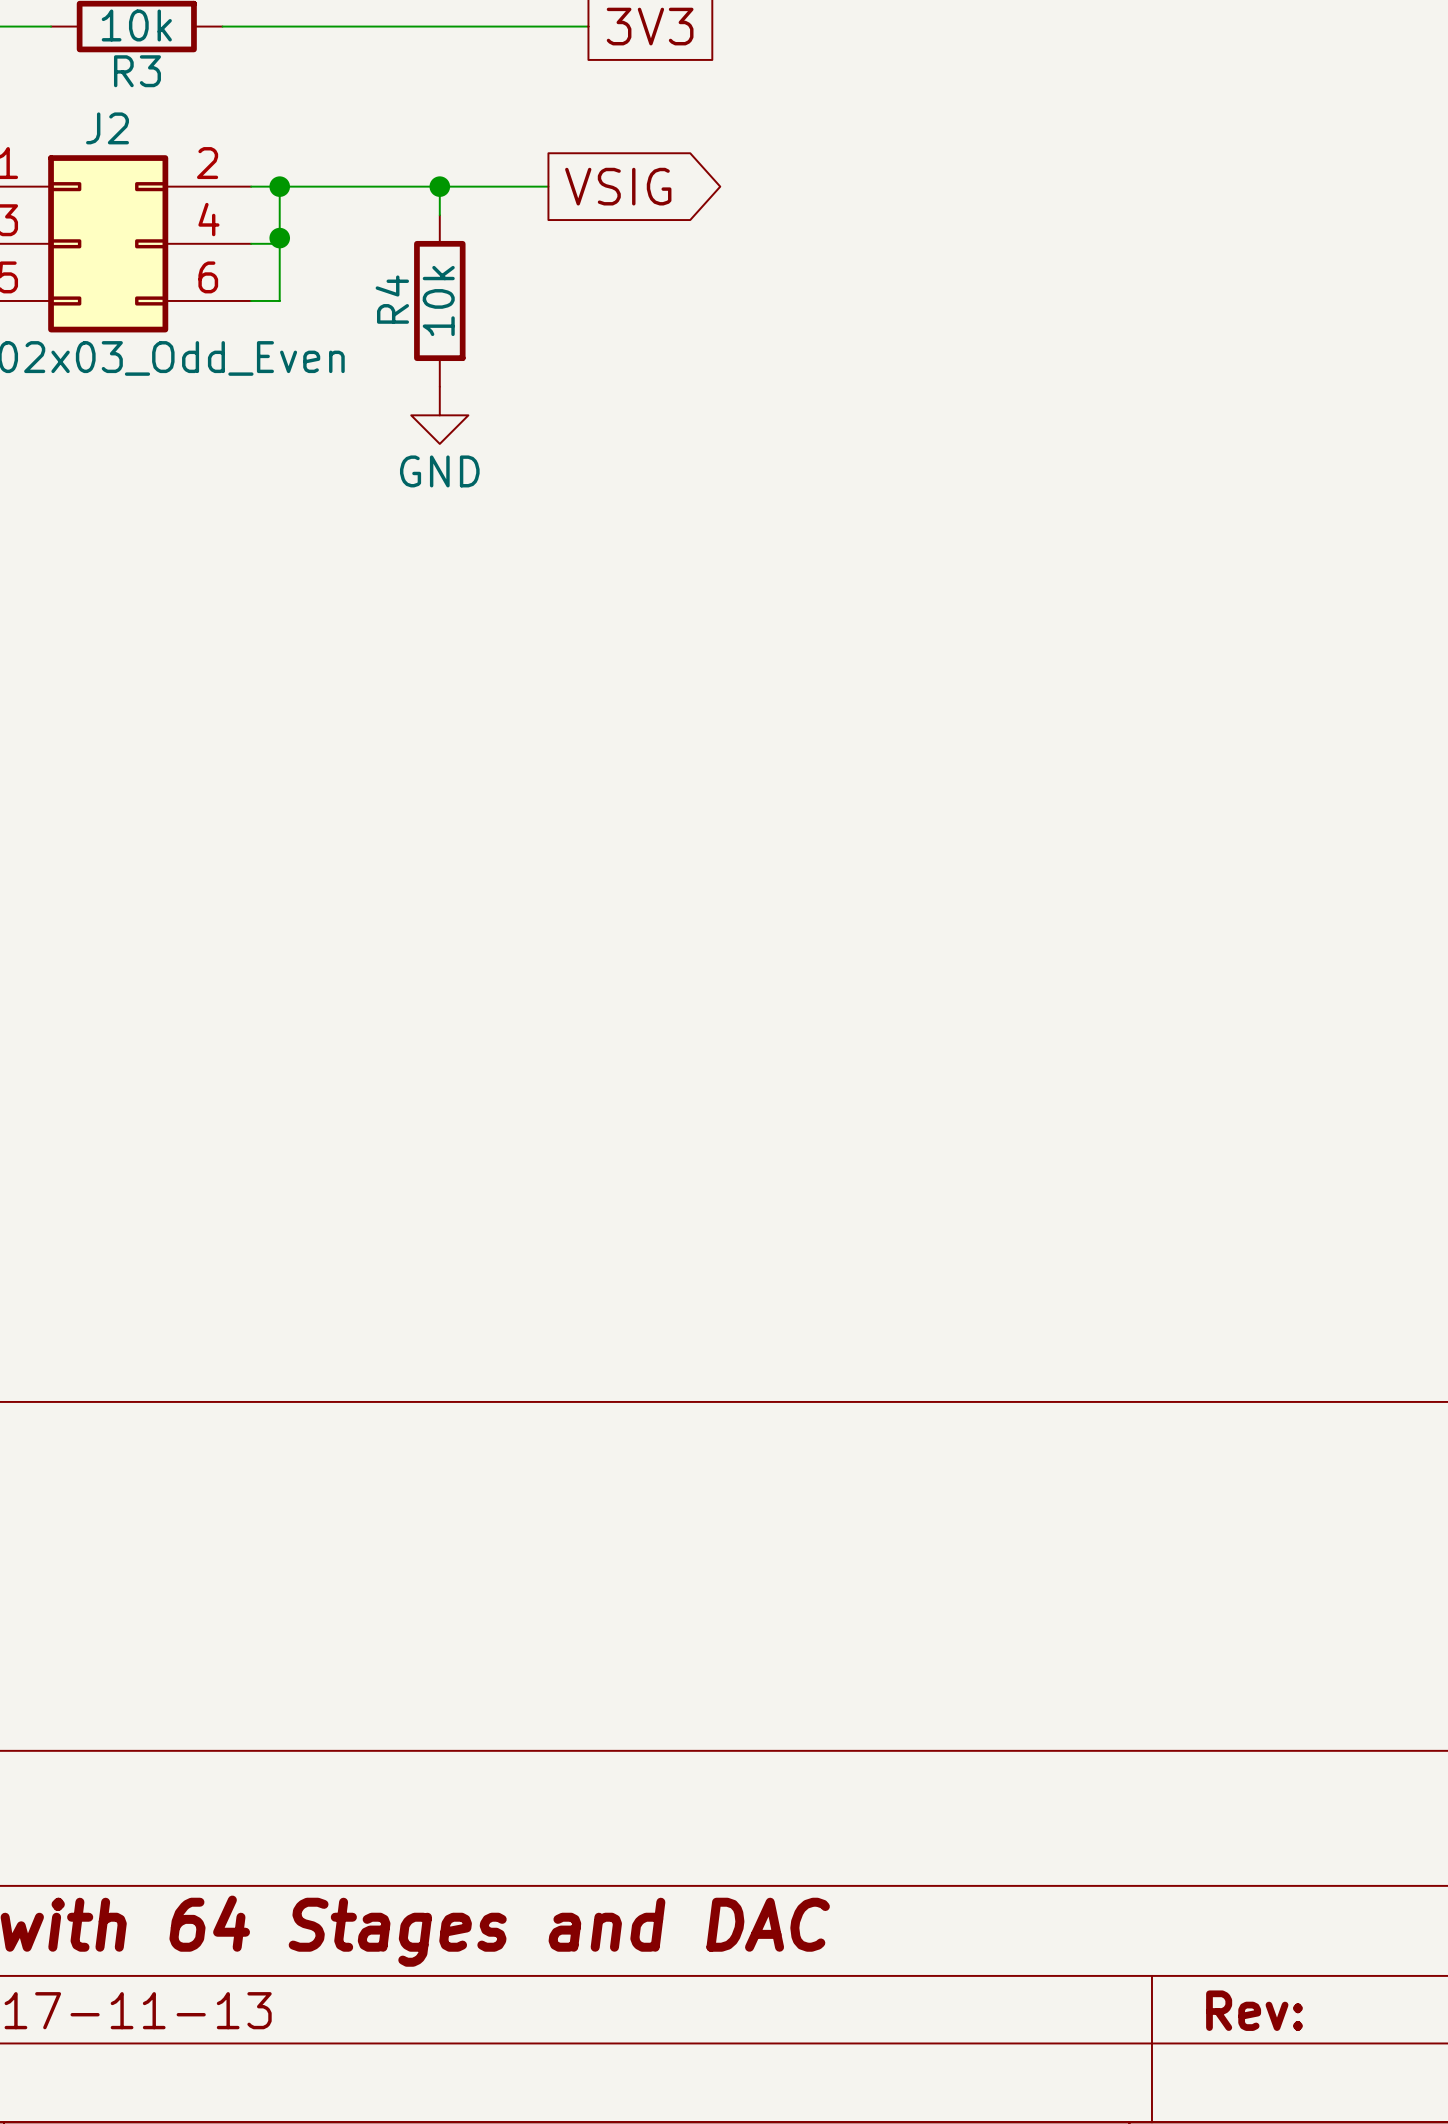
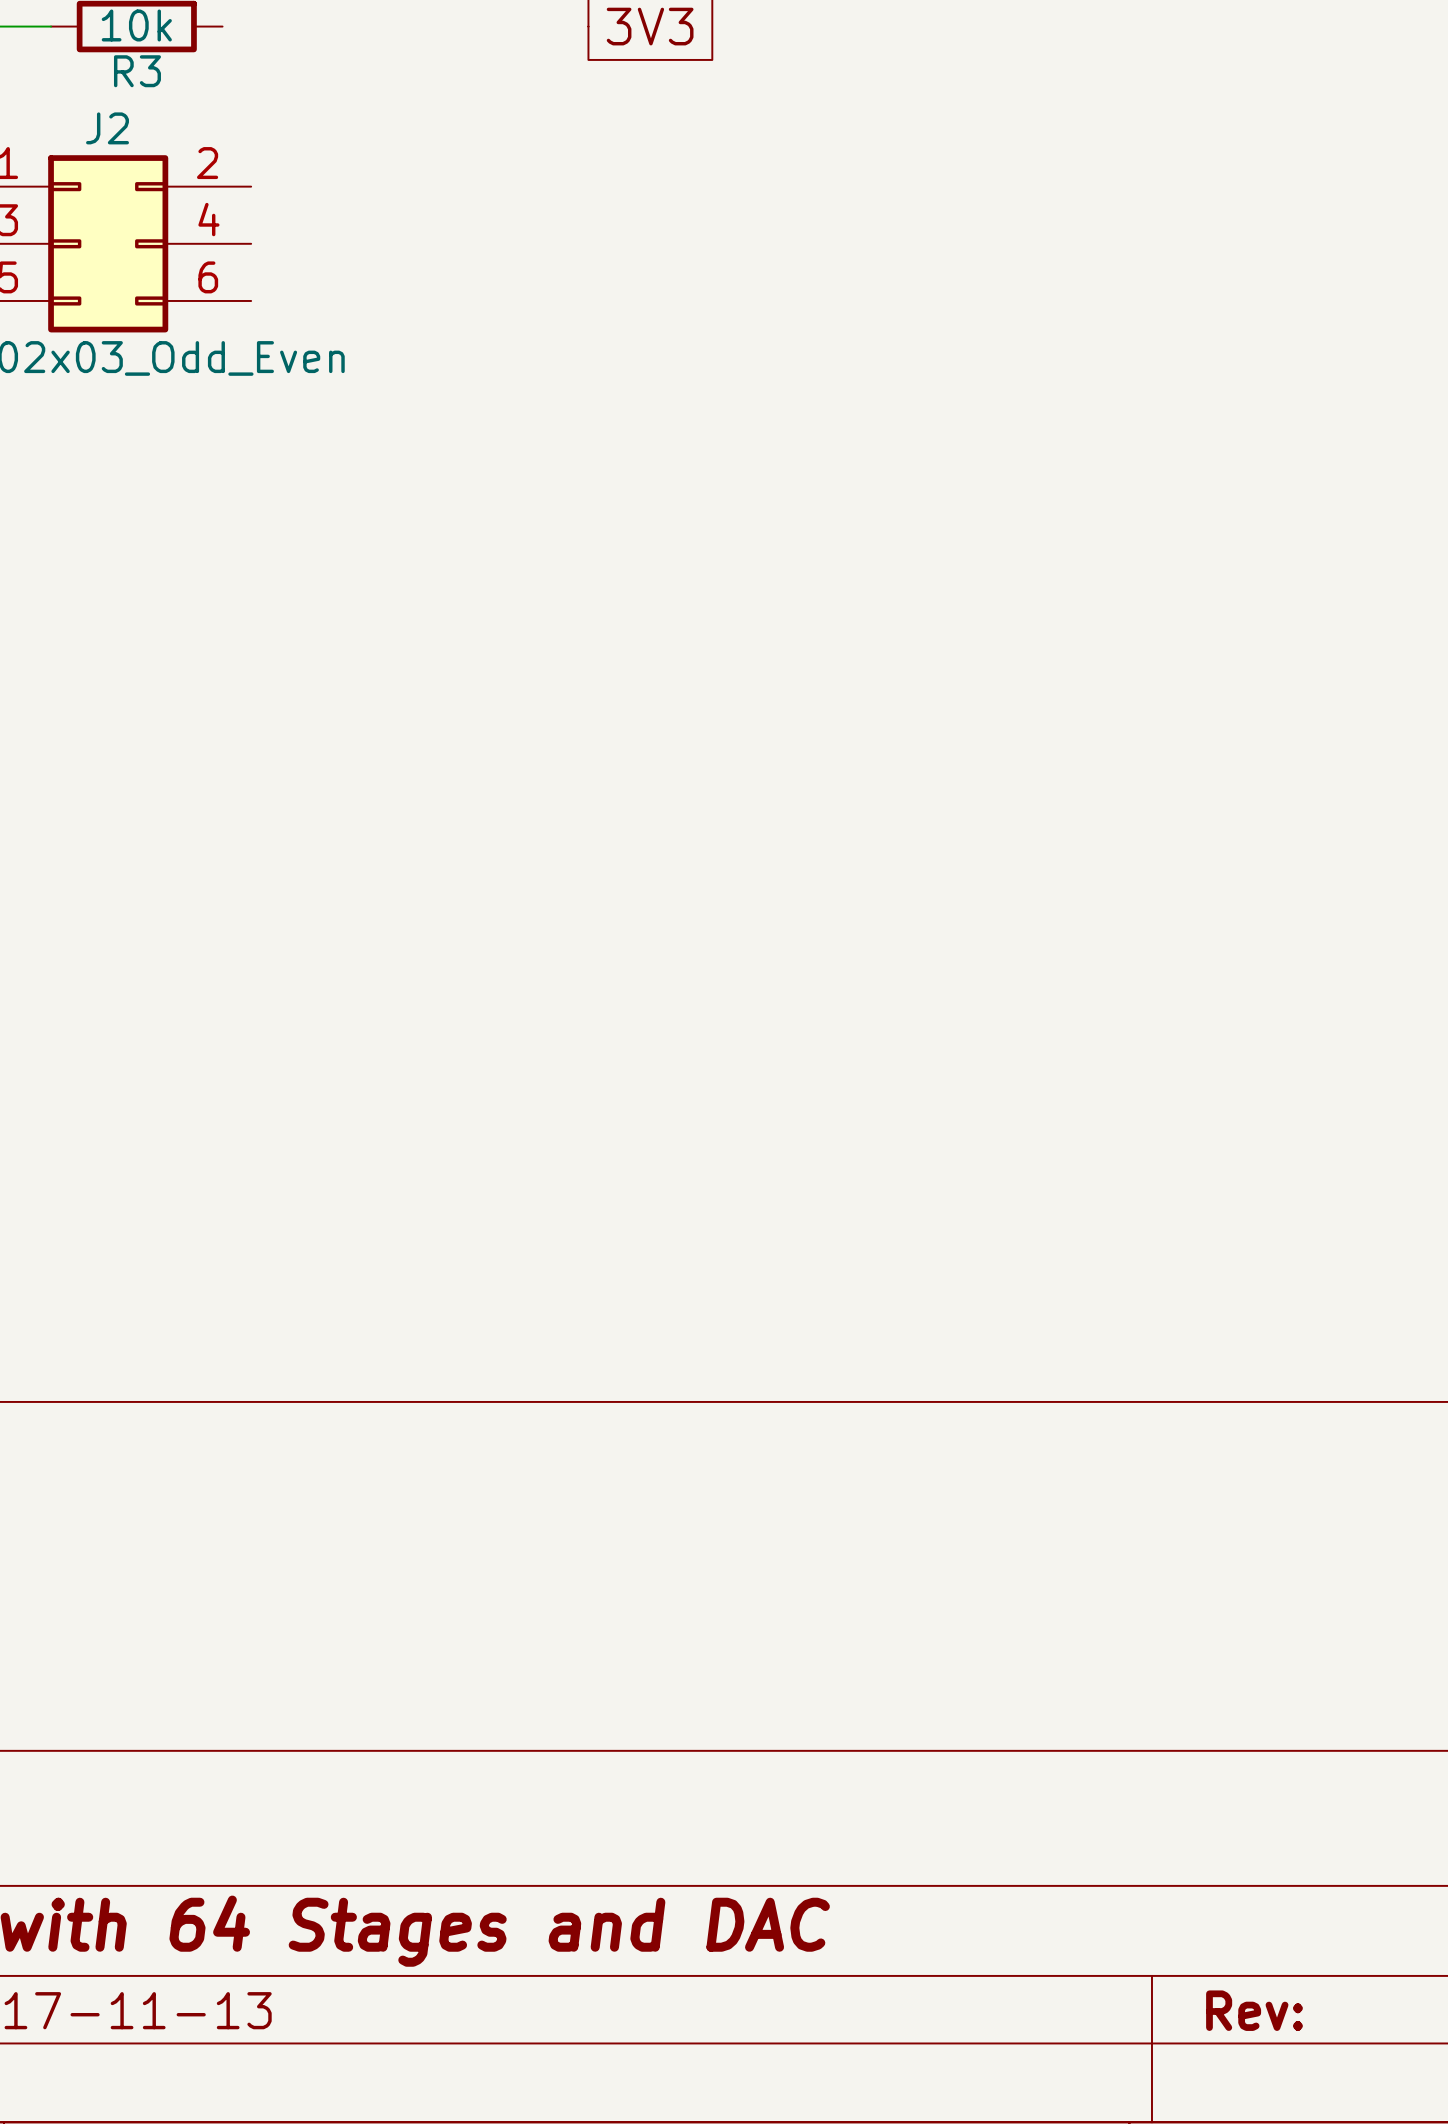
wire: (222, 26) (588, 26) -> none
wire: (251, 186) (548, 186) -> none
wire: (279, 186) (279, 300) (251, 300) -> none
junction: (279, 186) -> none
wire: (439, 186) (439, 215) -> none
junction: (439, 186) -> none
global label: VSIG (618, 186) -> none
junction: (279, 238) -> none
wire: (251, 243) (279, 243) -> none
R4: 10k (439, 300) -> none
power symbol: GND (439, 415) -> none

